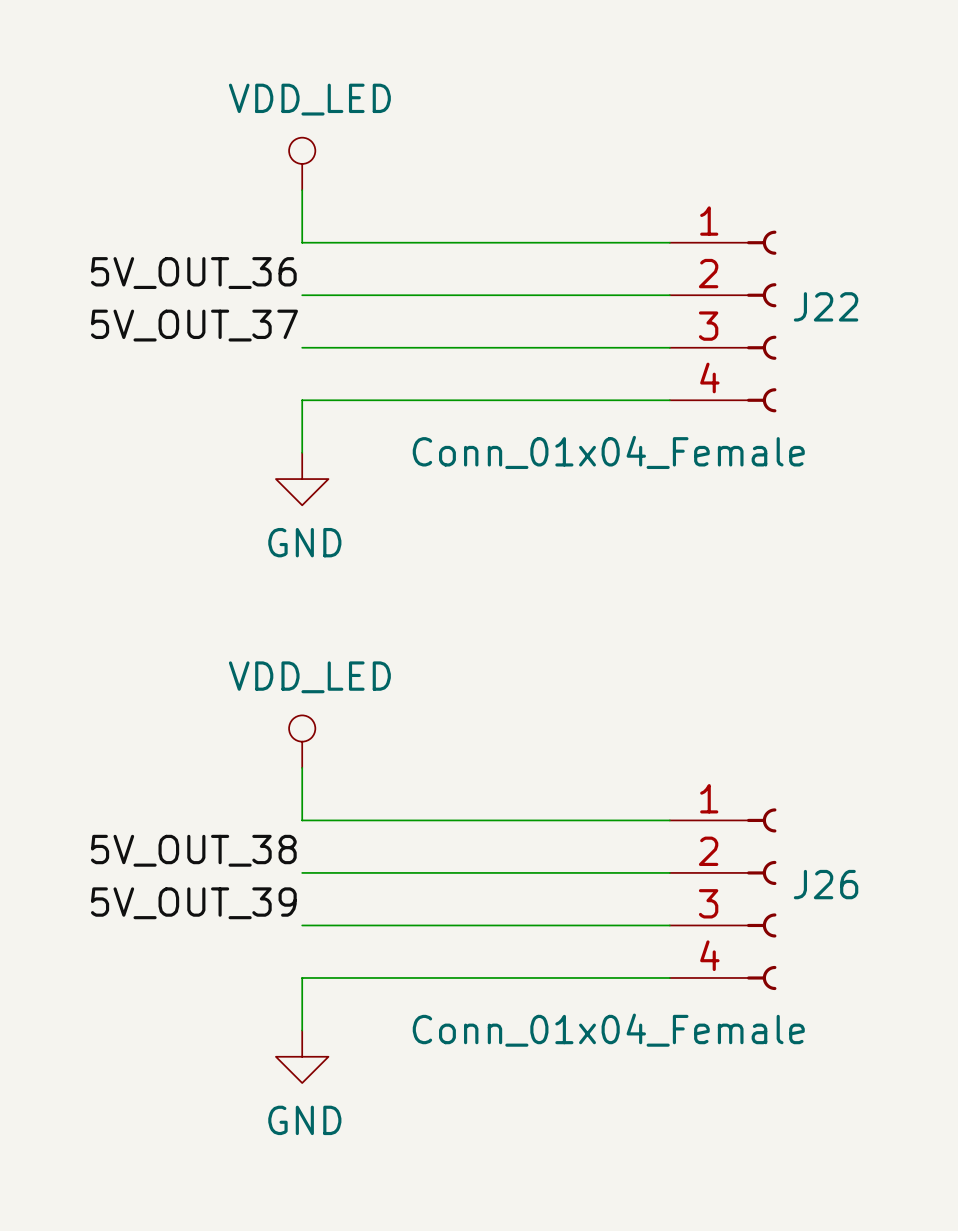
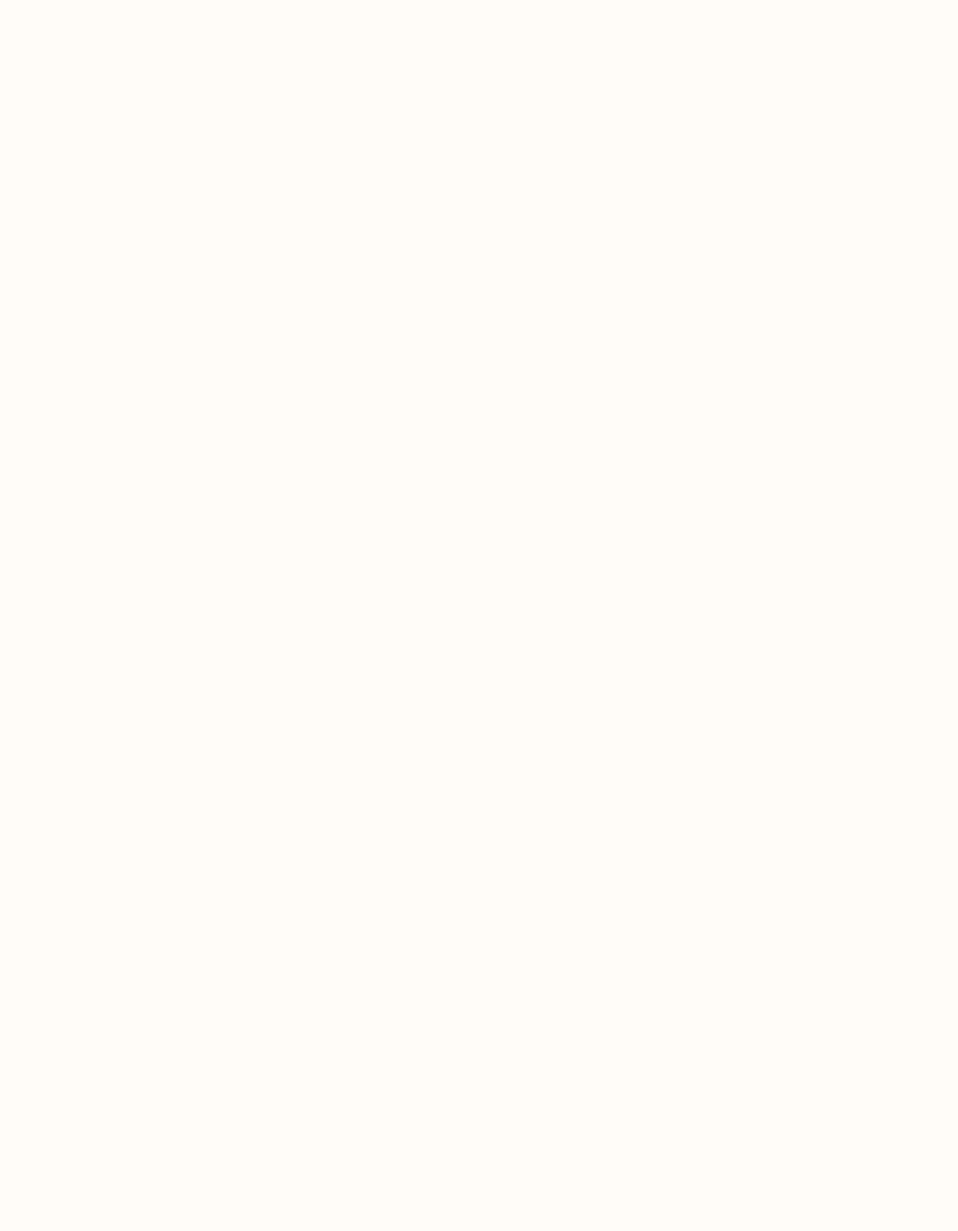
power symbol: VDD_LED (302, 163) -> none
wire: (302, 190) (302, 242) (669, 242) -> none
label: 5V_OUT_36 (193, 273) -> none
wire: (302, 295) (669, 295) -> none
J22: Conn_01x04_Female (723, 321) -> none
label: 5V_OUT_37 (194, 325) -> none
wire: (302, 347) (669, 347) -> none
wire: (669, 400) (302, 400) (302, 452) -> none
power symbol: GND (302, 479) -> none
power symbol: VDD_LED (302, 741) -> none
wire: (302, 767) (302, 820) (669, 820) -> none
label: 5V_OUT_38 (193, 850) -> none
wire: (302, 872) (669, 872) -> none
J26: Conn_01x04_Female (723, 899) -> none
label: 5V_OUT_39 (193, 903) -> none
wire: (302, 925) (669, 925) -> none
wire: (669, 977) (302, 977) (302, 1030) -> none
power symbol: GND (302, 1056) -> none

